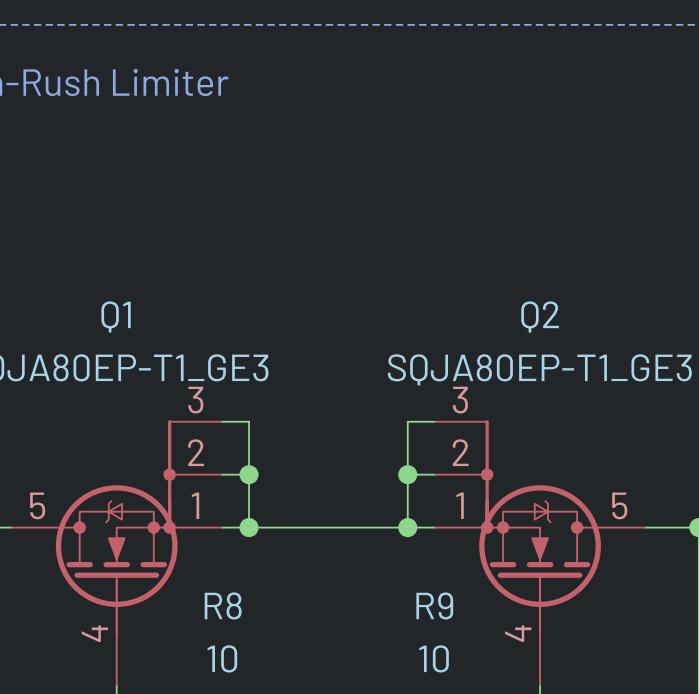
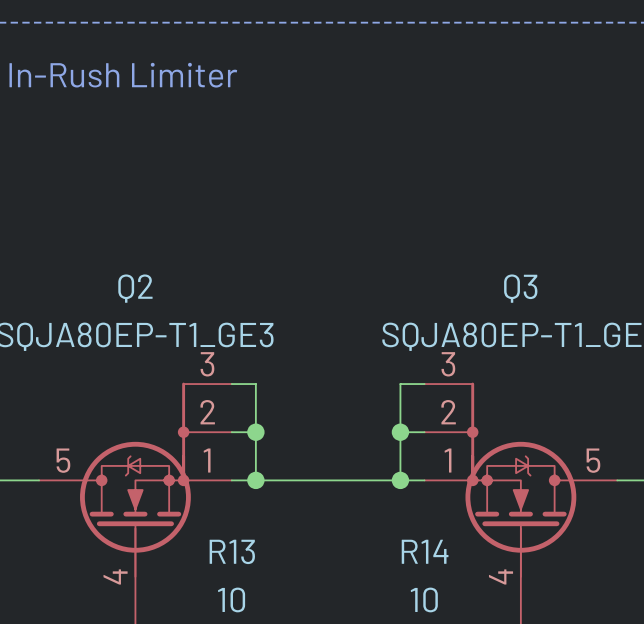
Q1 name: Q1 (116, 316) -> Q2 (135, 288)
Q2 name: Q2 (540, 316) -> Q3 (520, 288)
R8 name: R8 (223, 605) -> R13 (232, 551)
R9 name: R9 (434, 605) -> R14 (425, 551)

